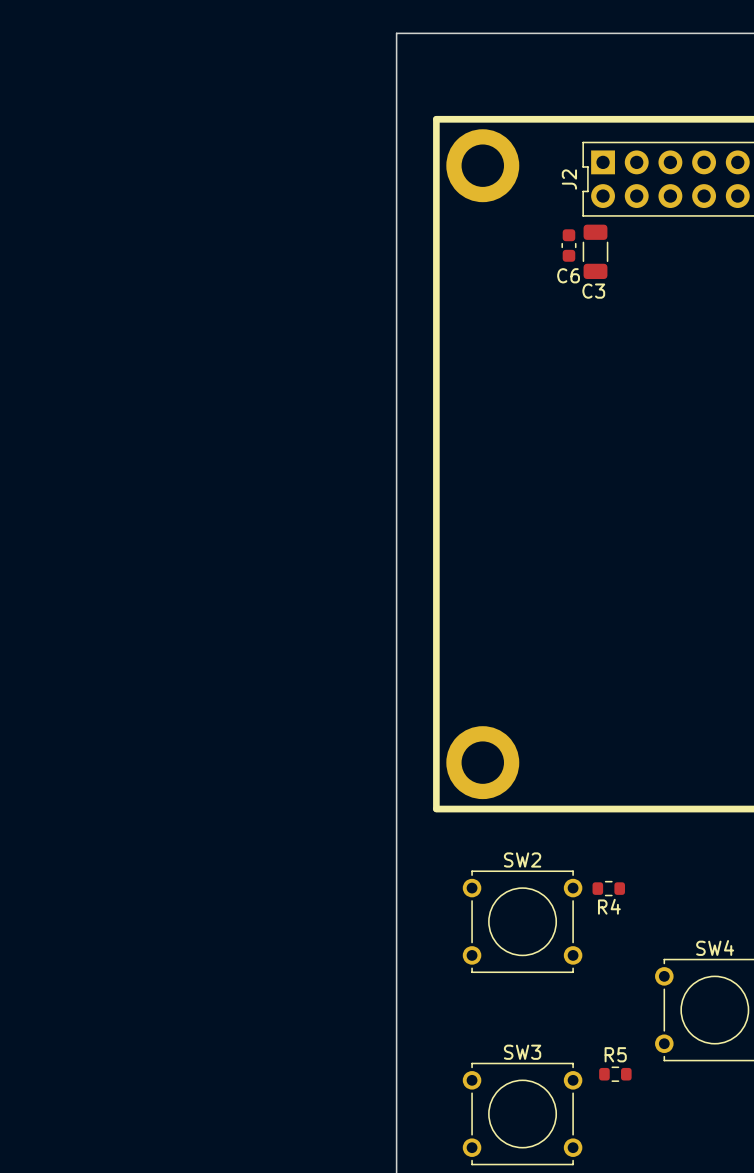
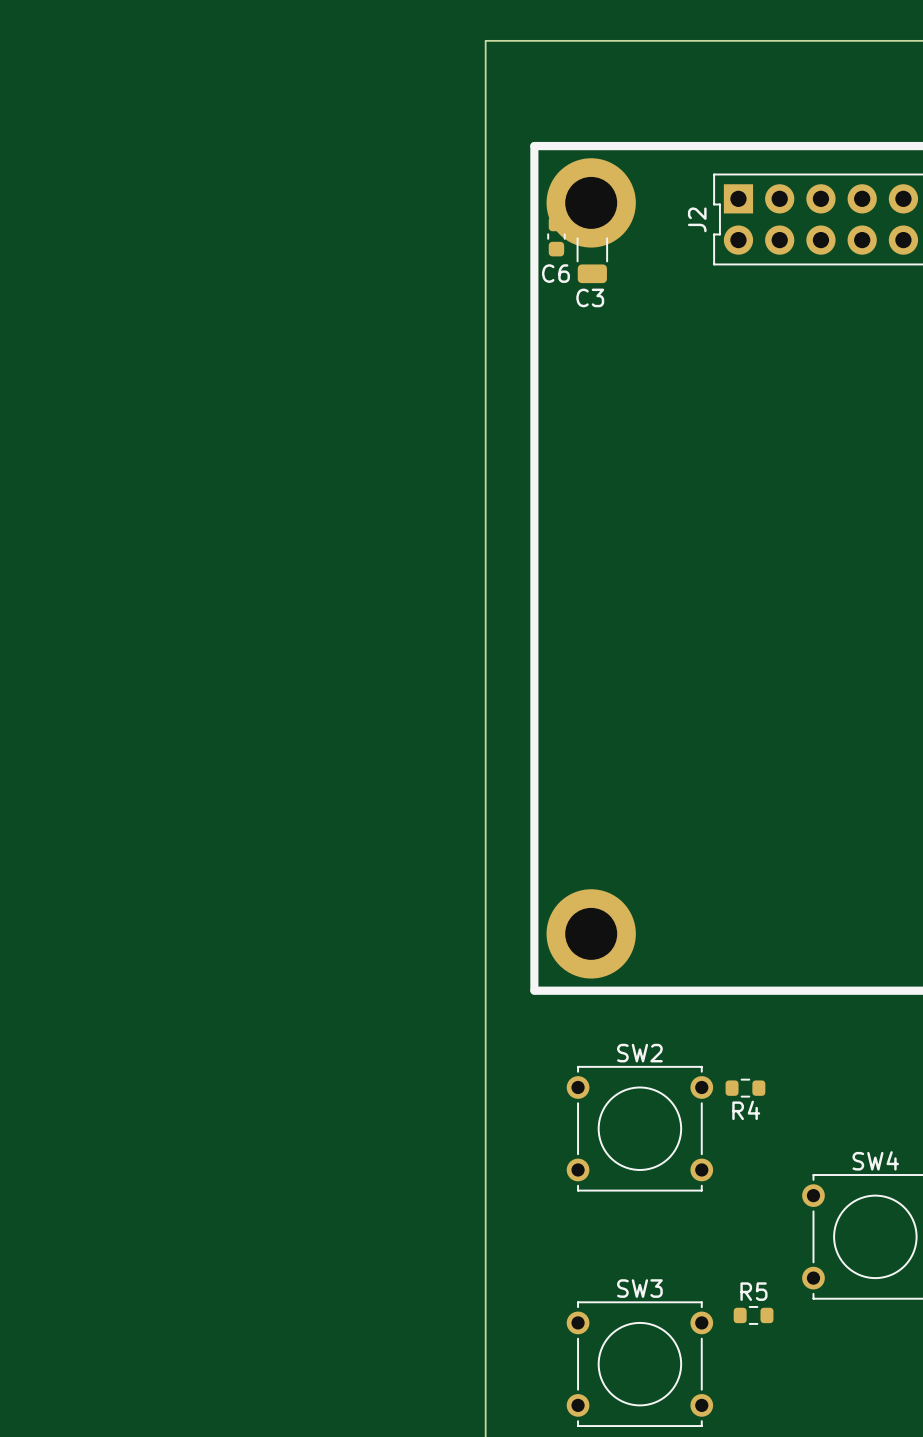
C6 position: (568, 245) -> (556, 236)
C3 position: (595, 251) -> (592, 249)

